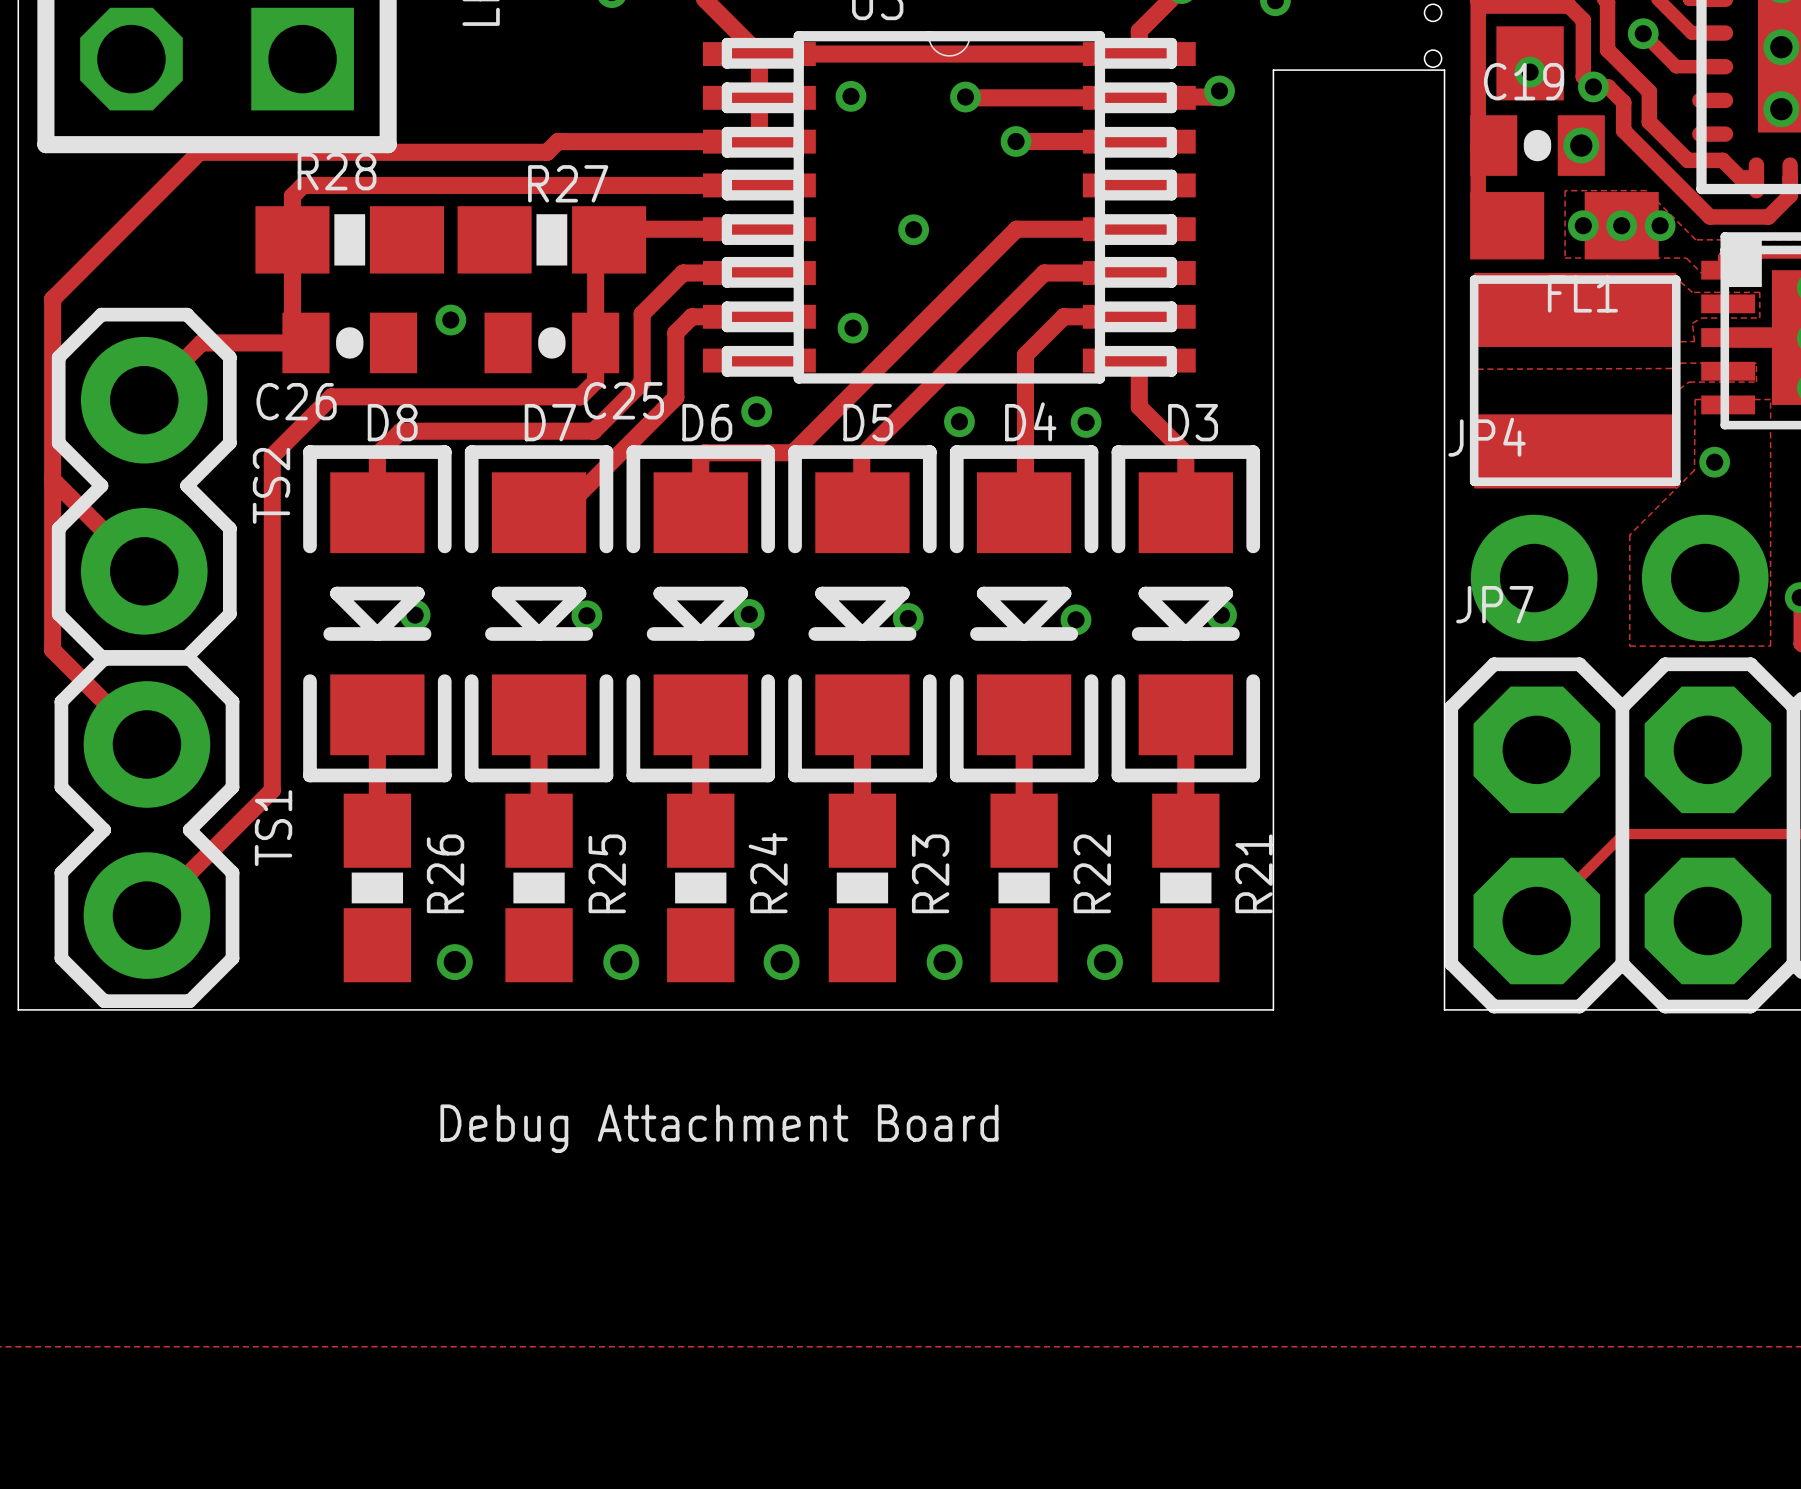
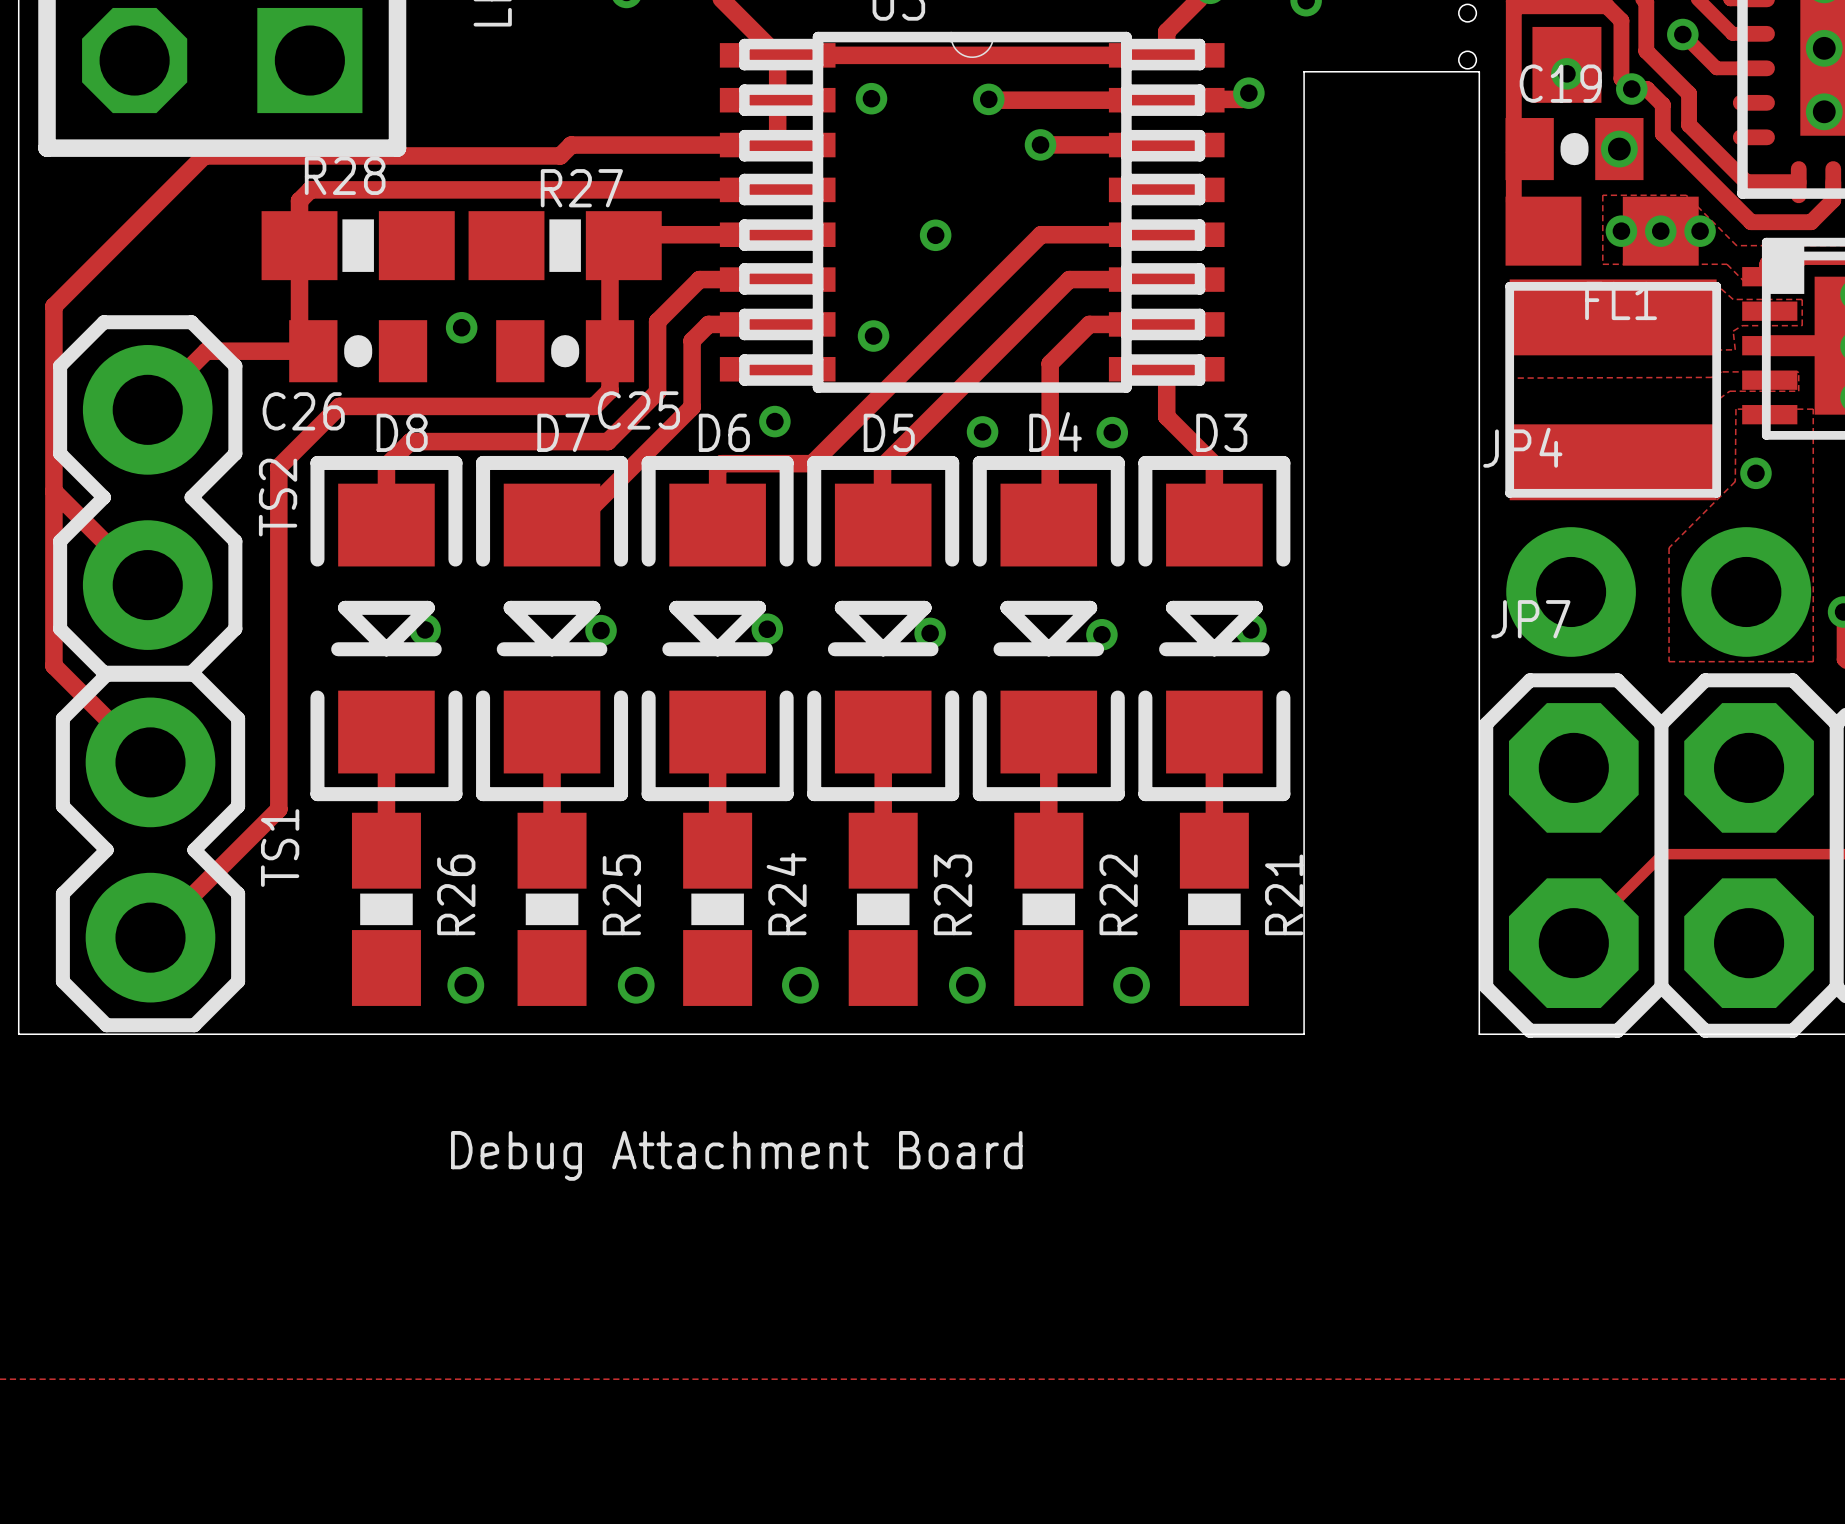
track: (1687, 160) (1722, 160) (1740, 177) -> (1728, 164) (1746, 182) (1782, 182)

